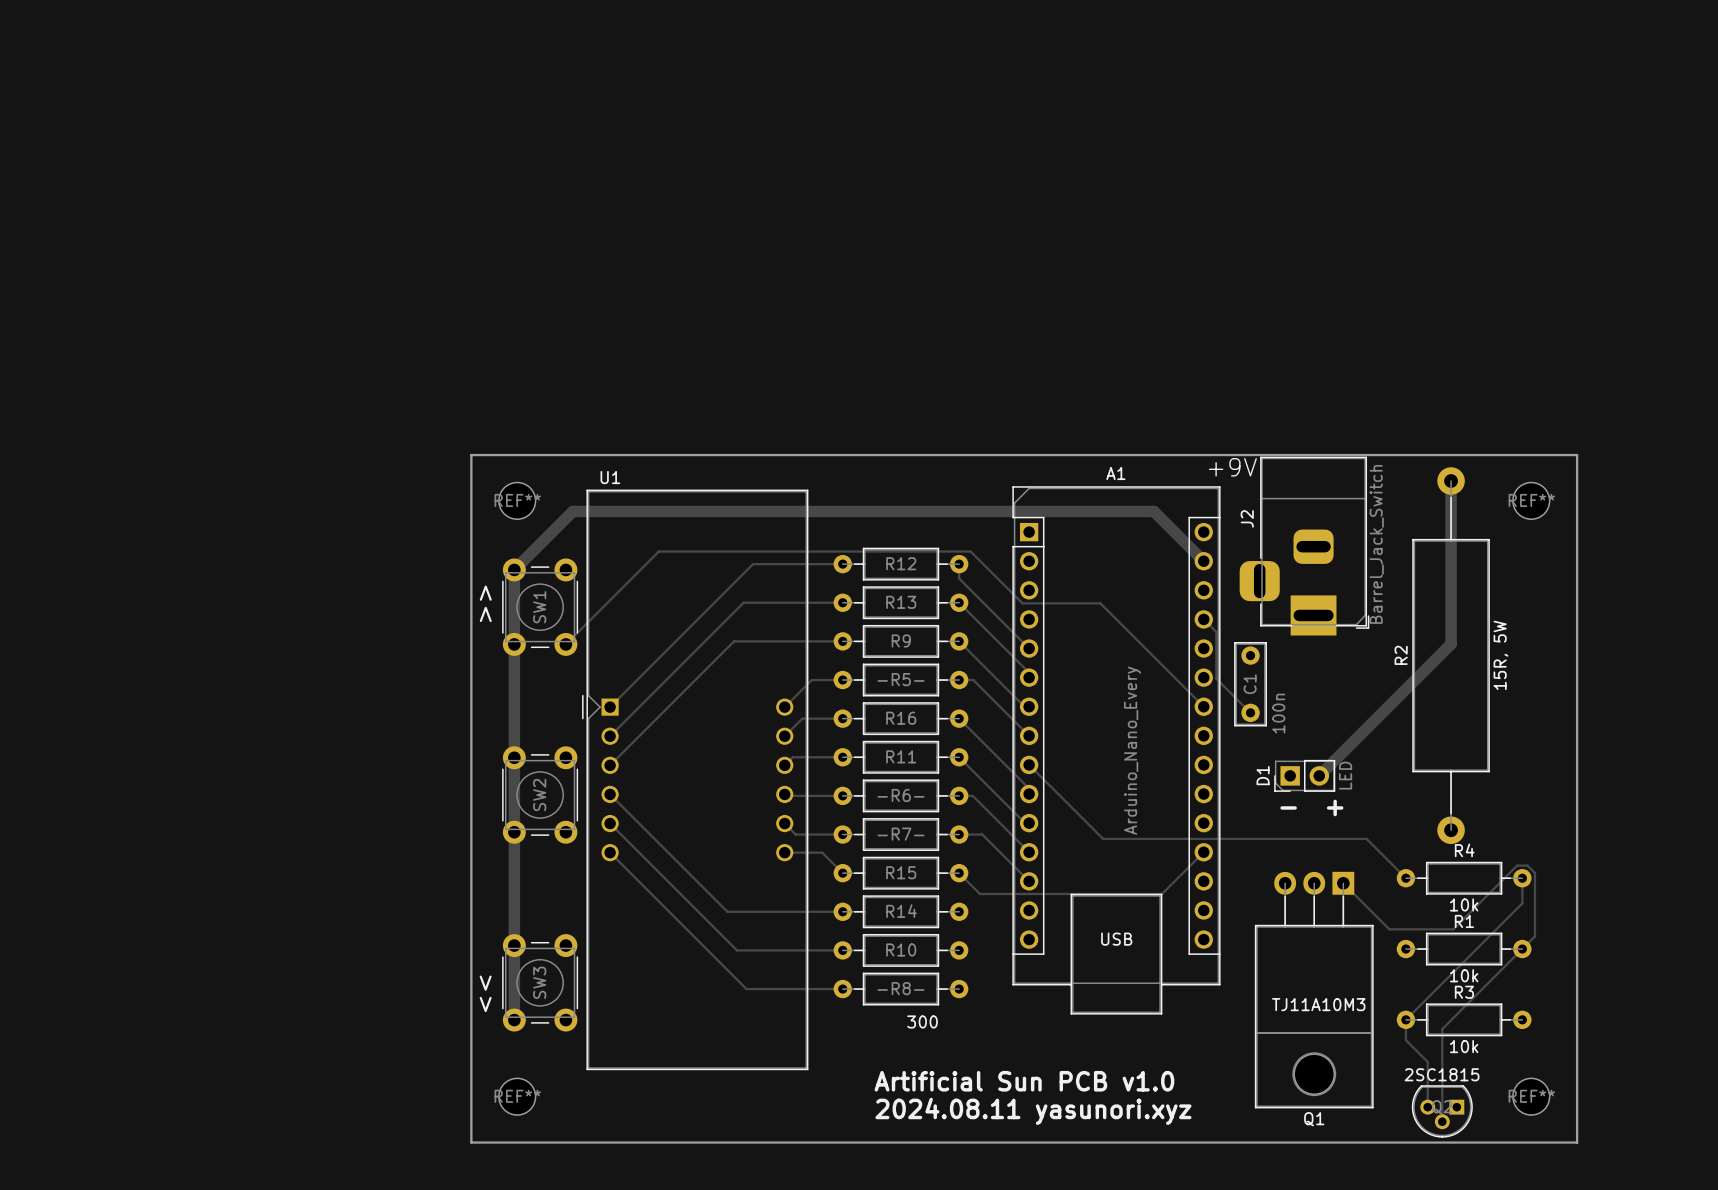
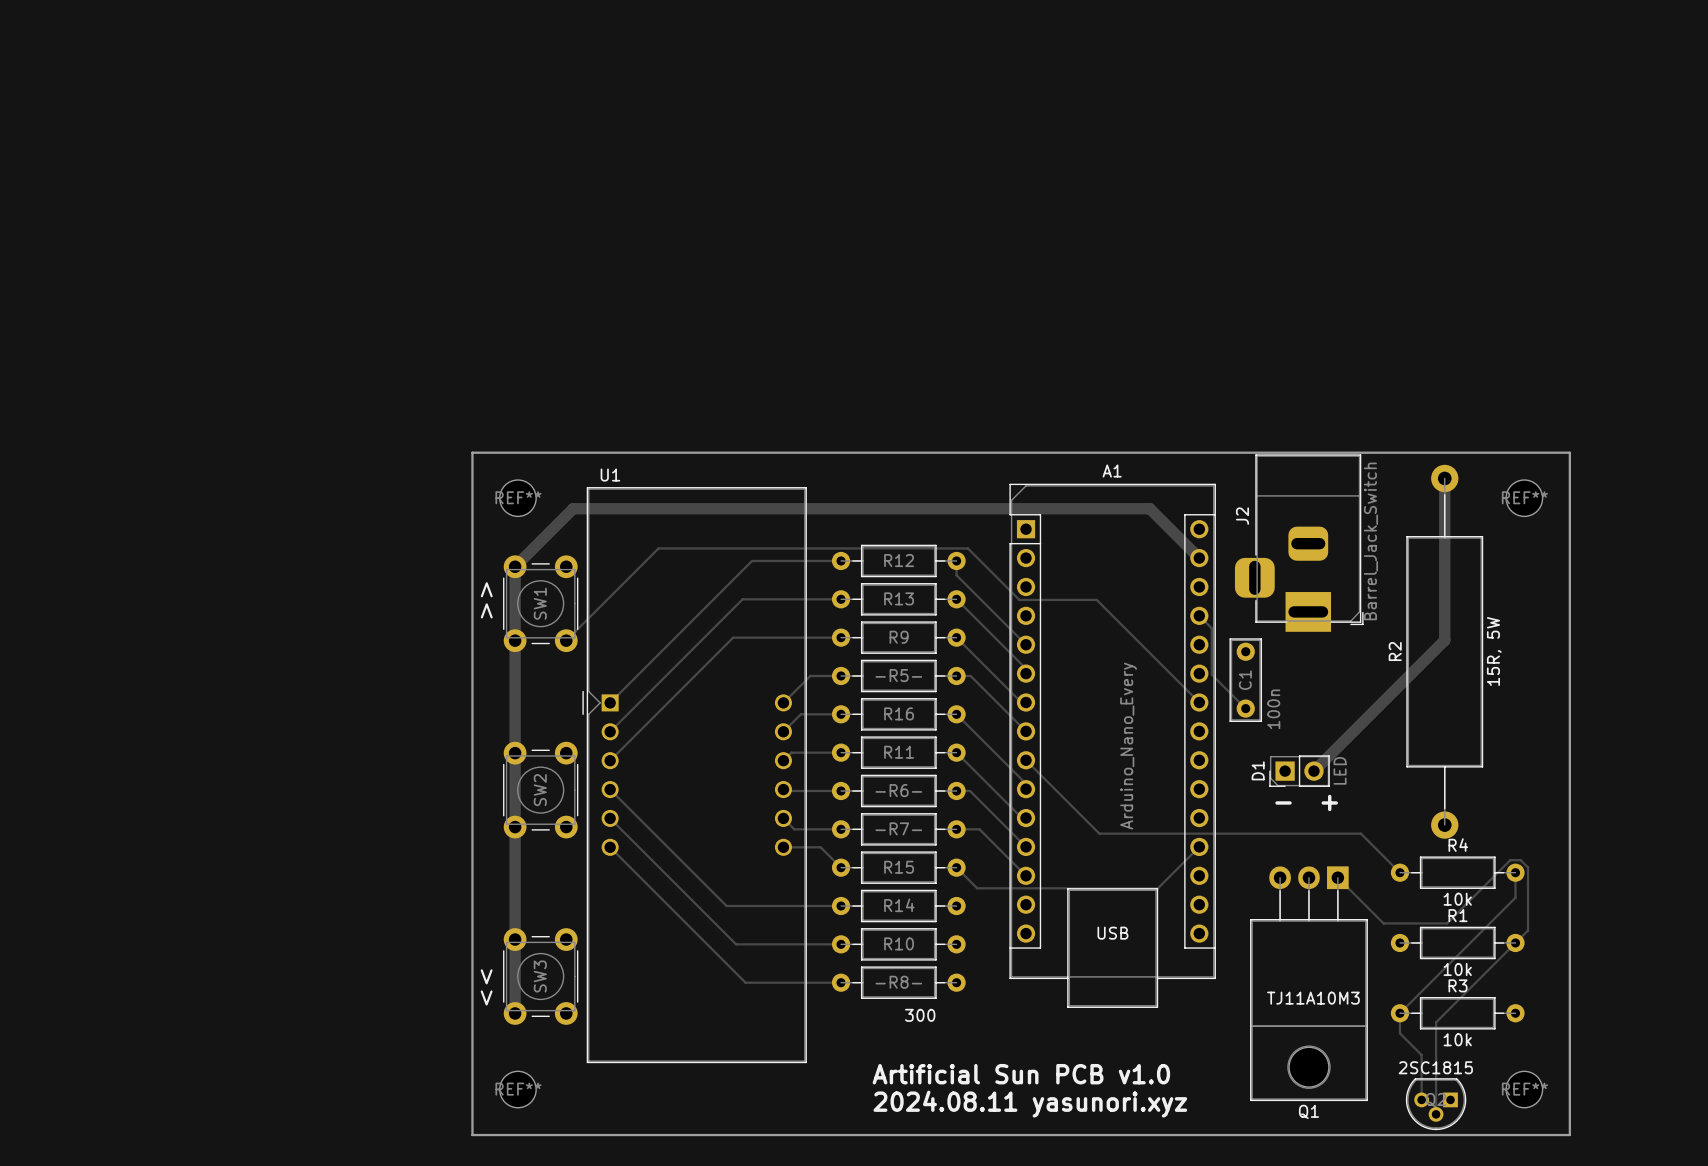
text: +9V (1232, 467) -> none

